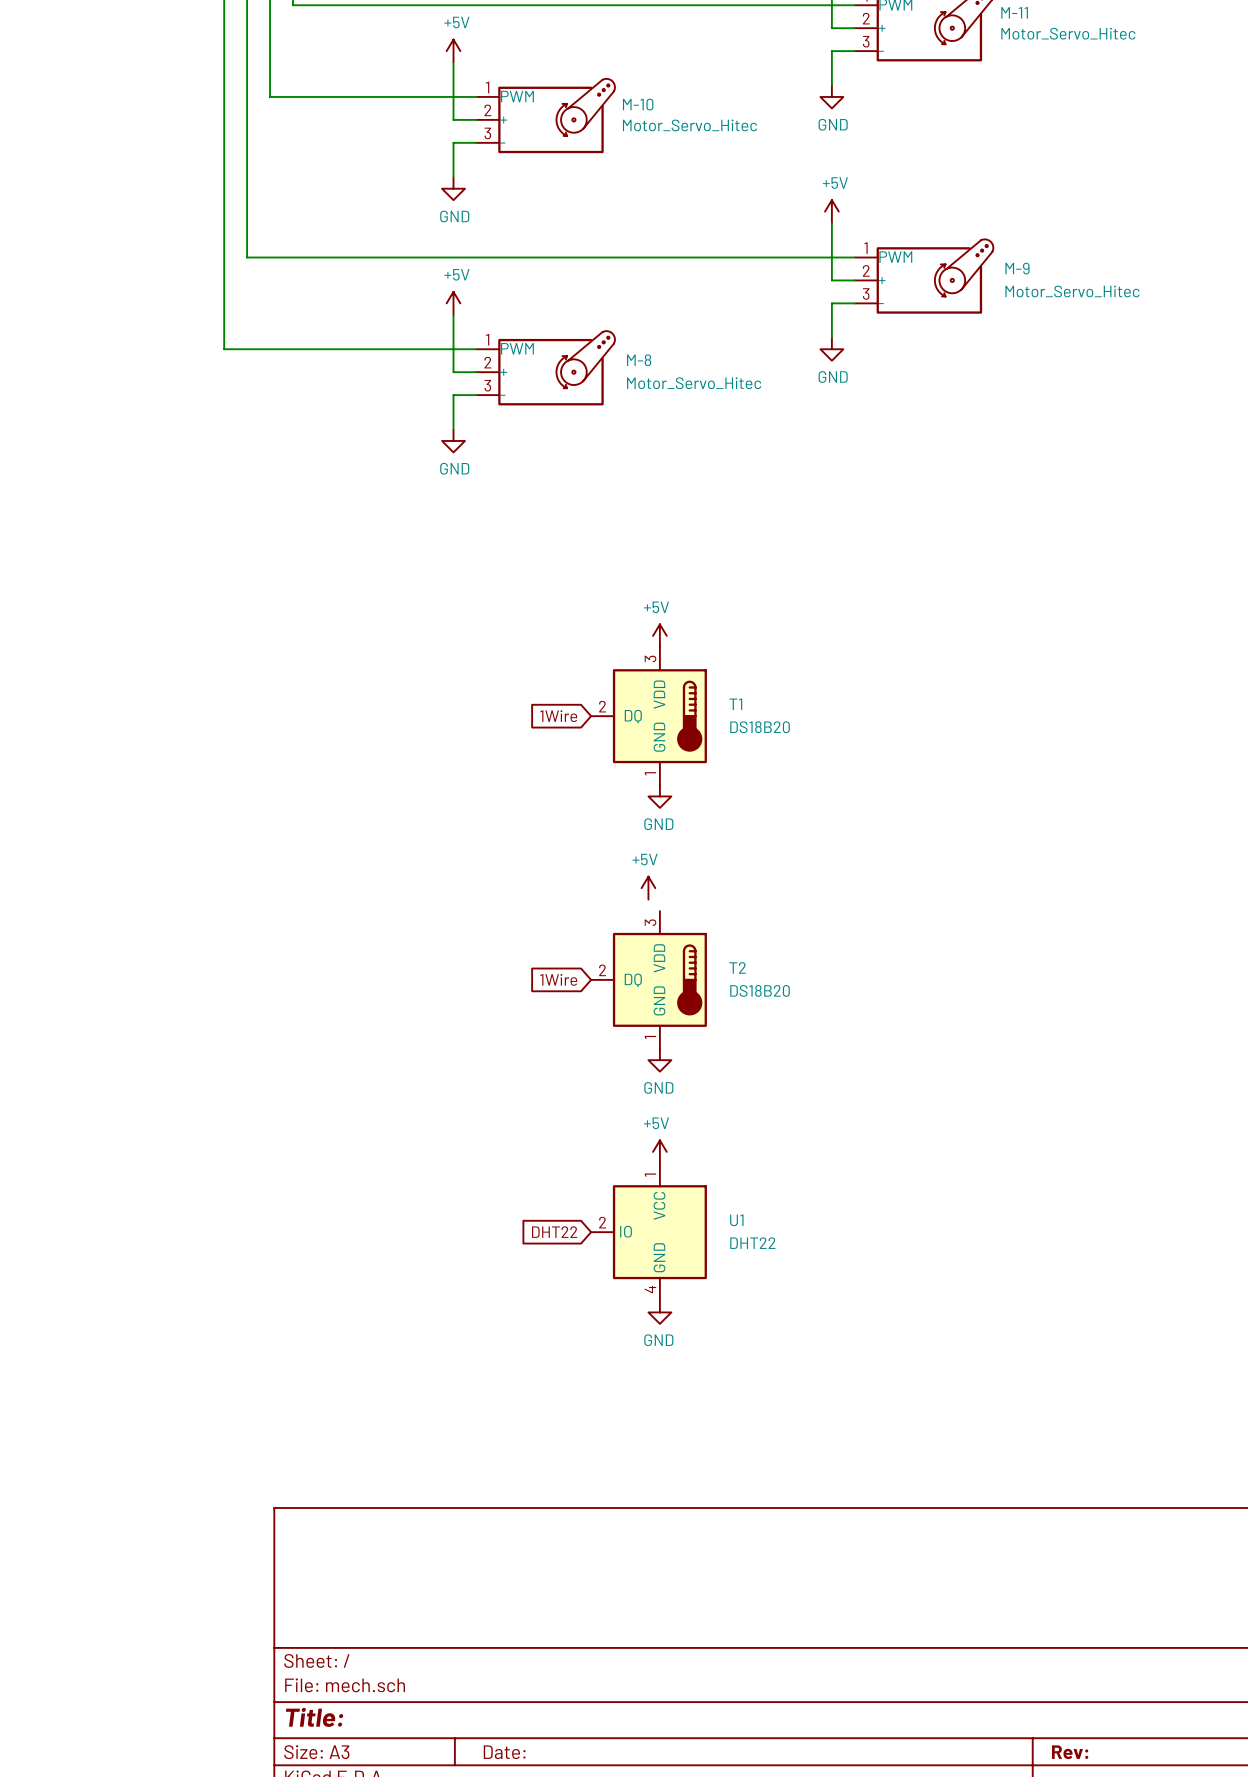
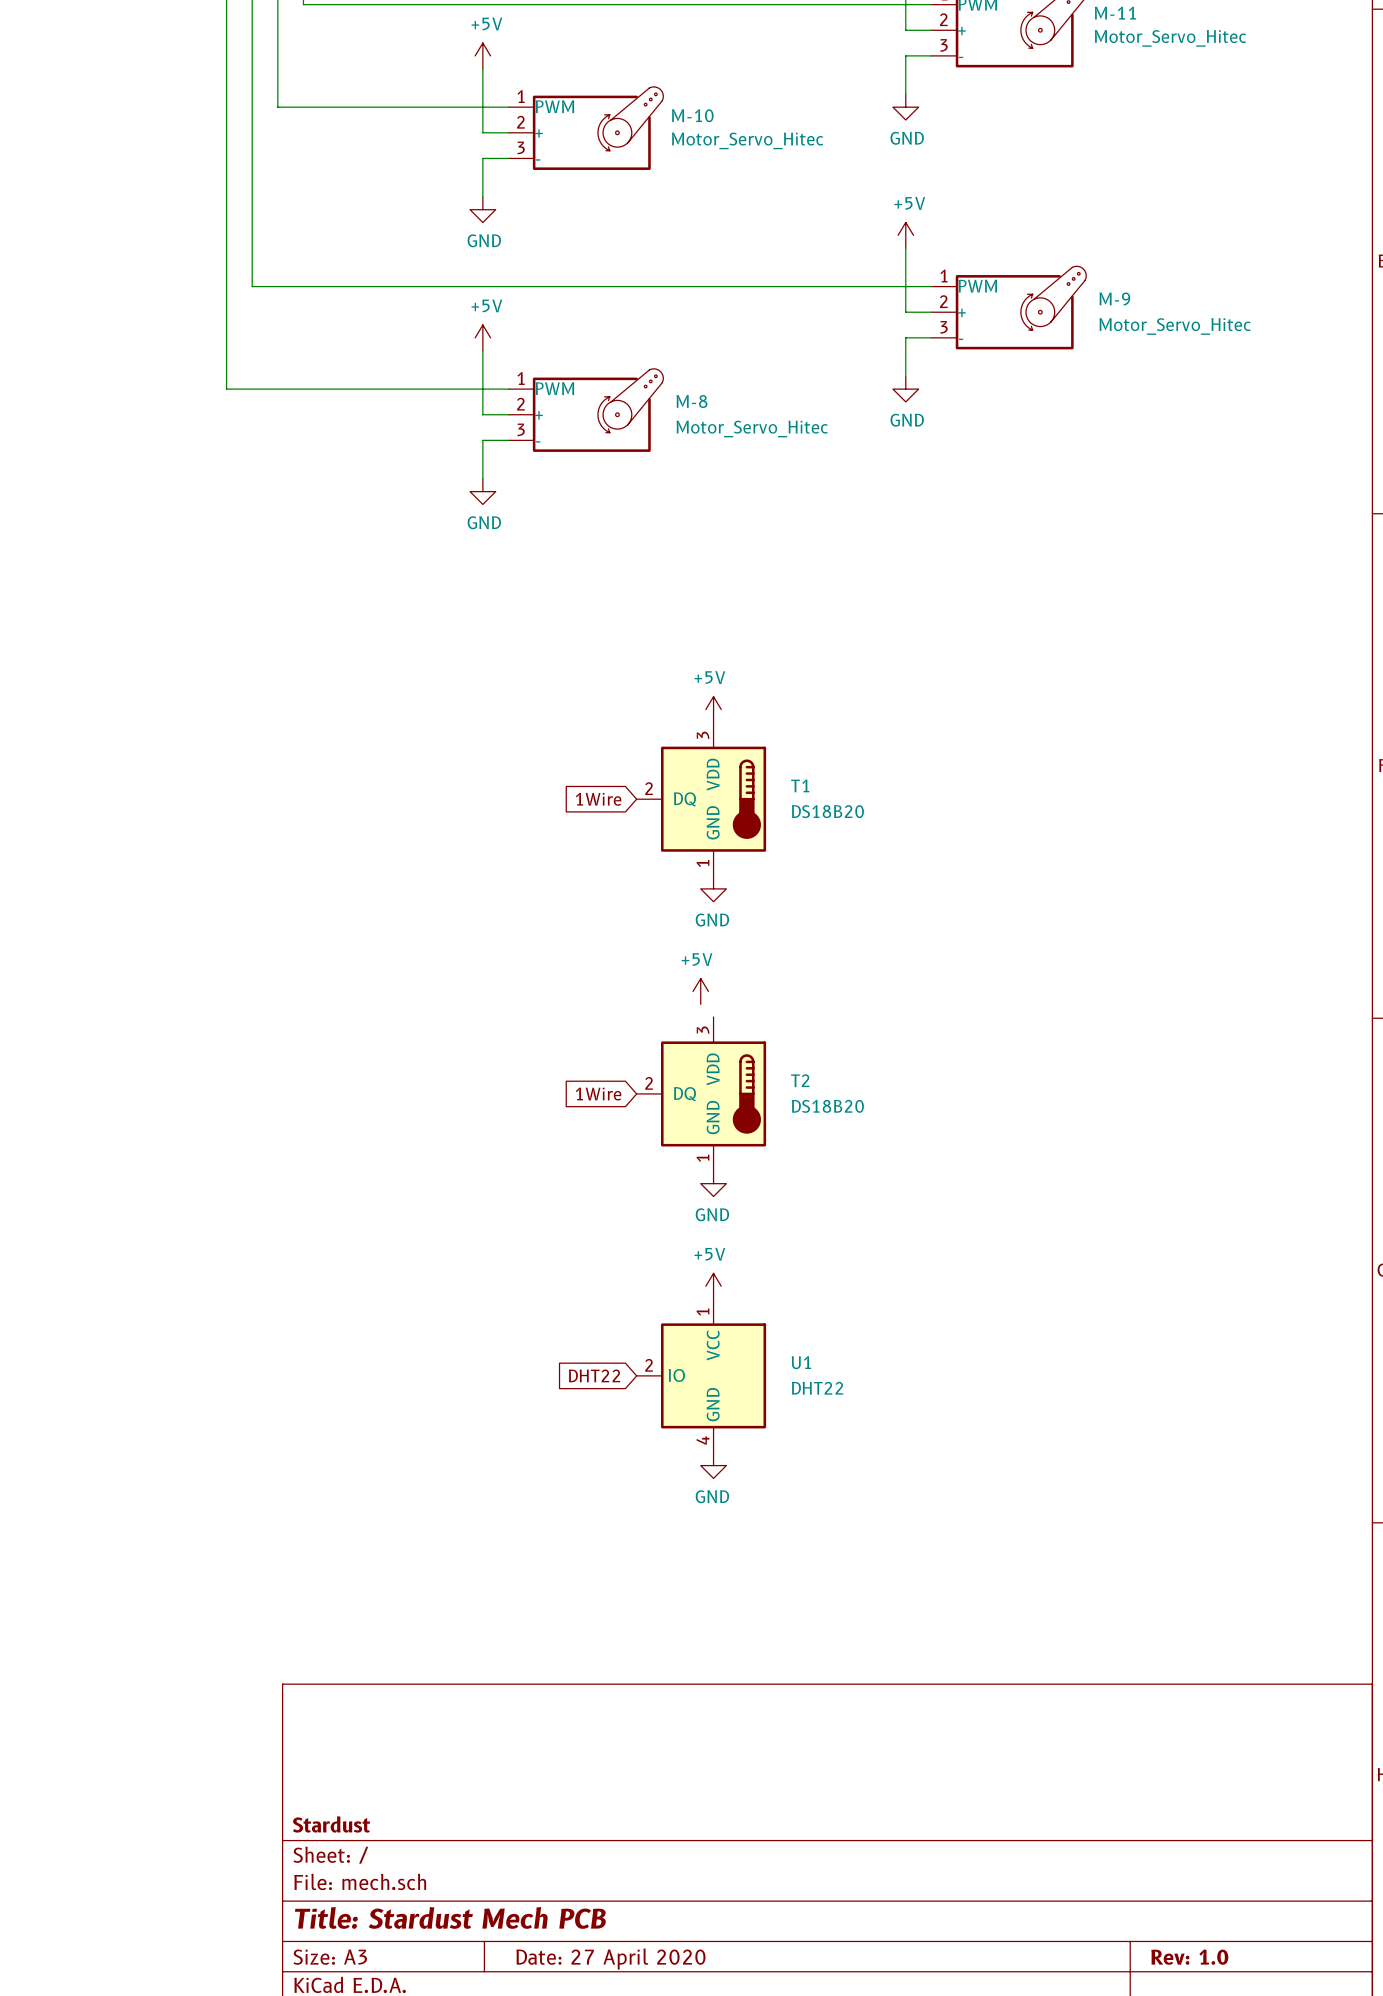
title block: none -> Stardust (331, 1824)
title block: Title: (314, 1717) -> Title: Stardust Mech PCB (450, 1917)
title block: Date: (504, 1752) -> Date: 27 April 2020 (610, 1959)
title block: Rev: (1070, 1752) -> Rev: 1.0 (1189, 1957)

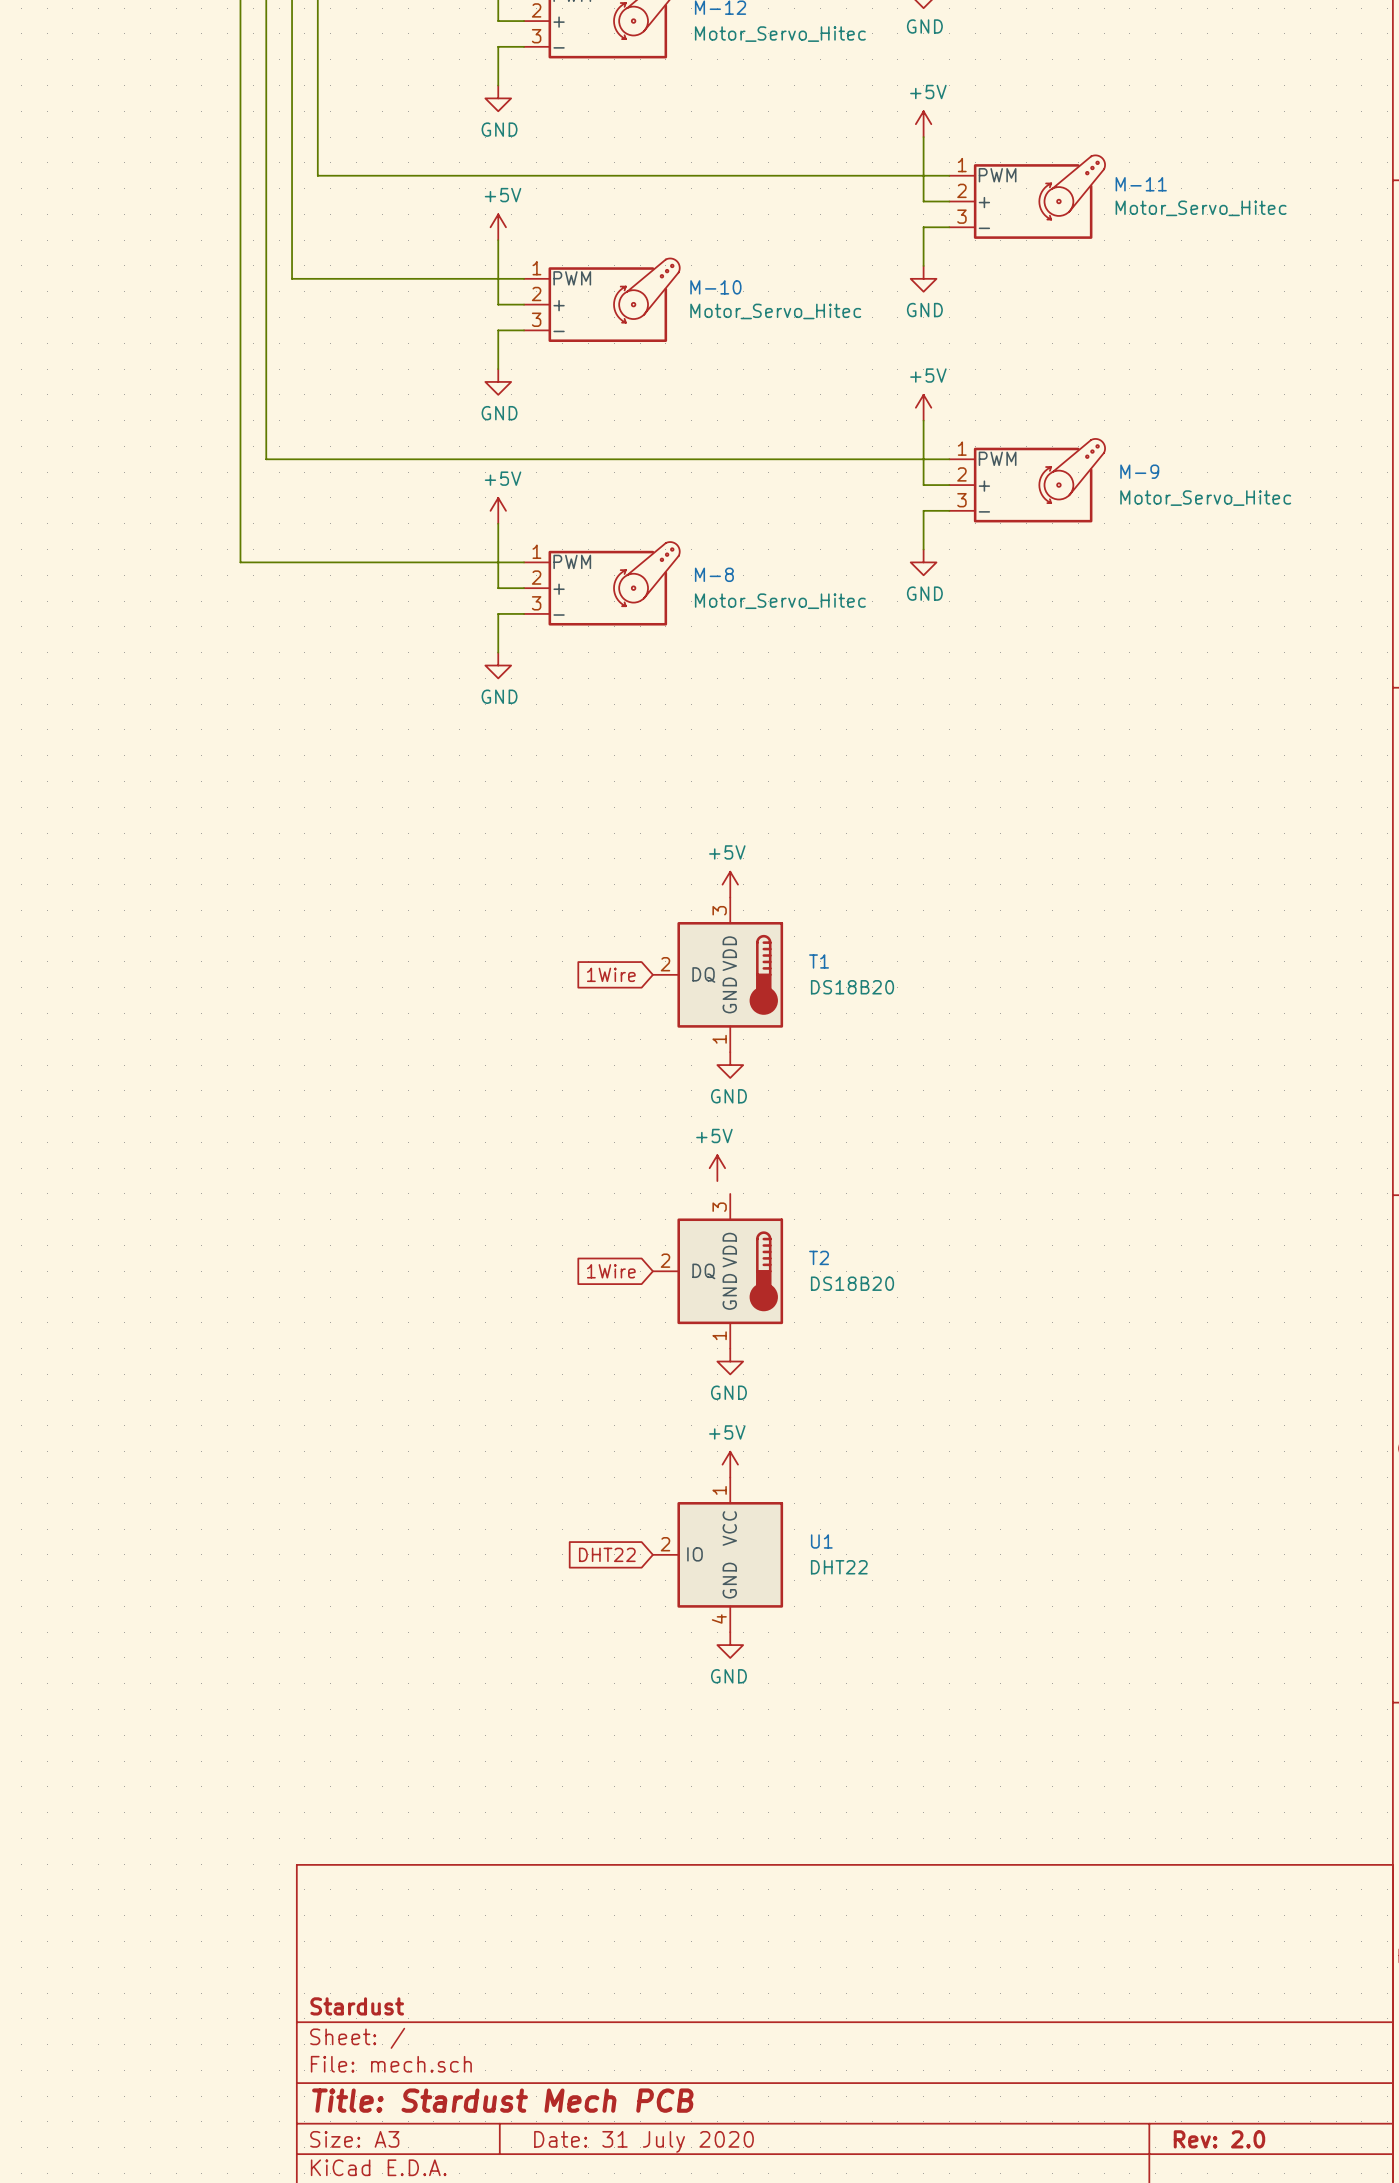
title block: Rev: 1.0 (1189, 1957) -> Rev: 2.0 (1219, 2139)
title block: Date: 27 April 2020 (610, 1959) -> Date: 31 July 2020 (643, 2141)

